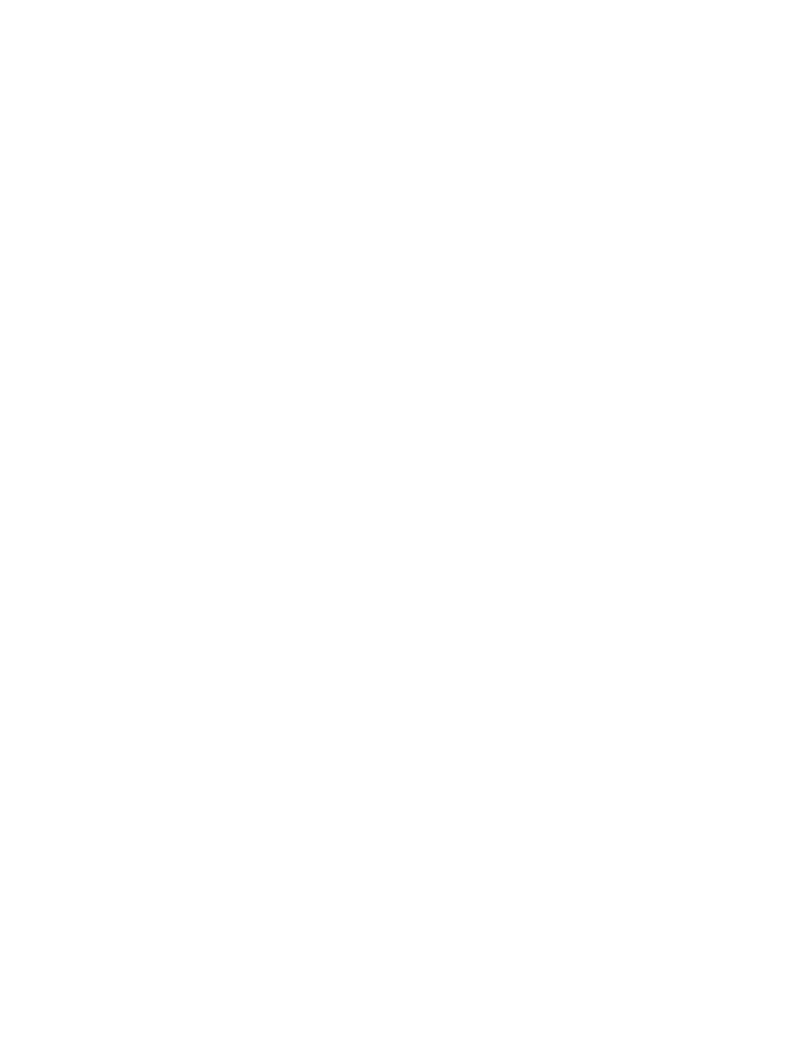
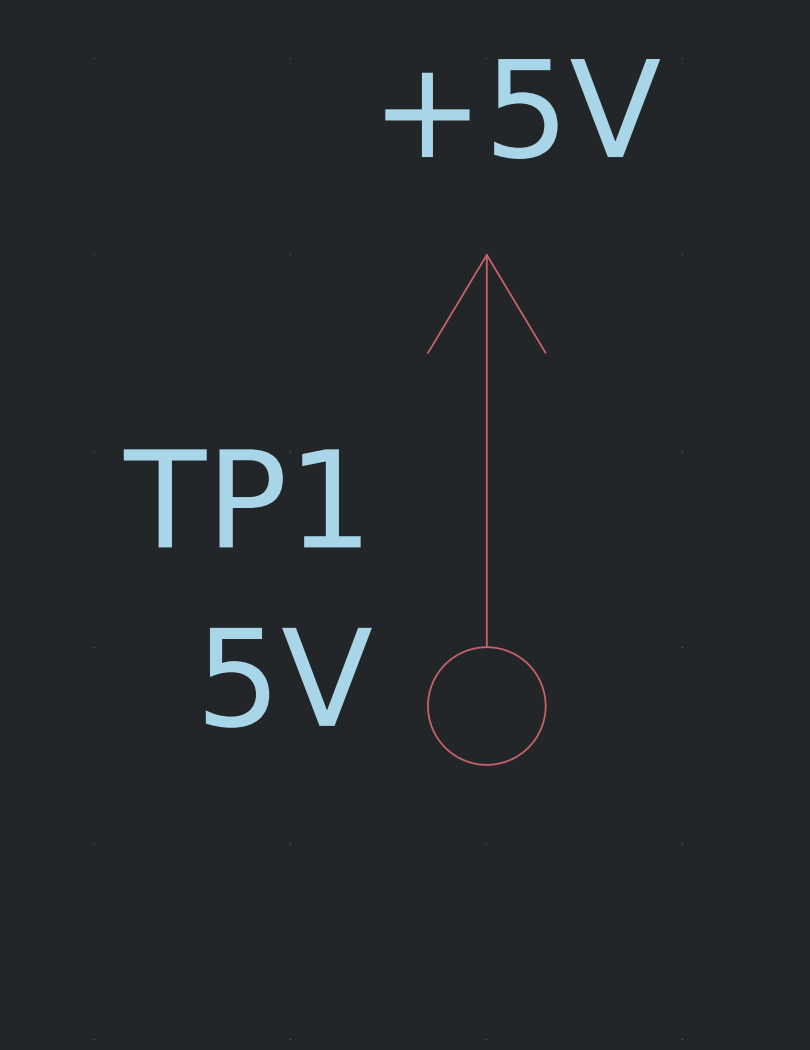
power symbol: none -> +5V (486, 352)
TP1: none -> 5V (486, 607)

